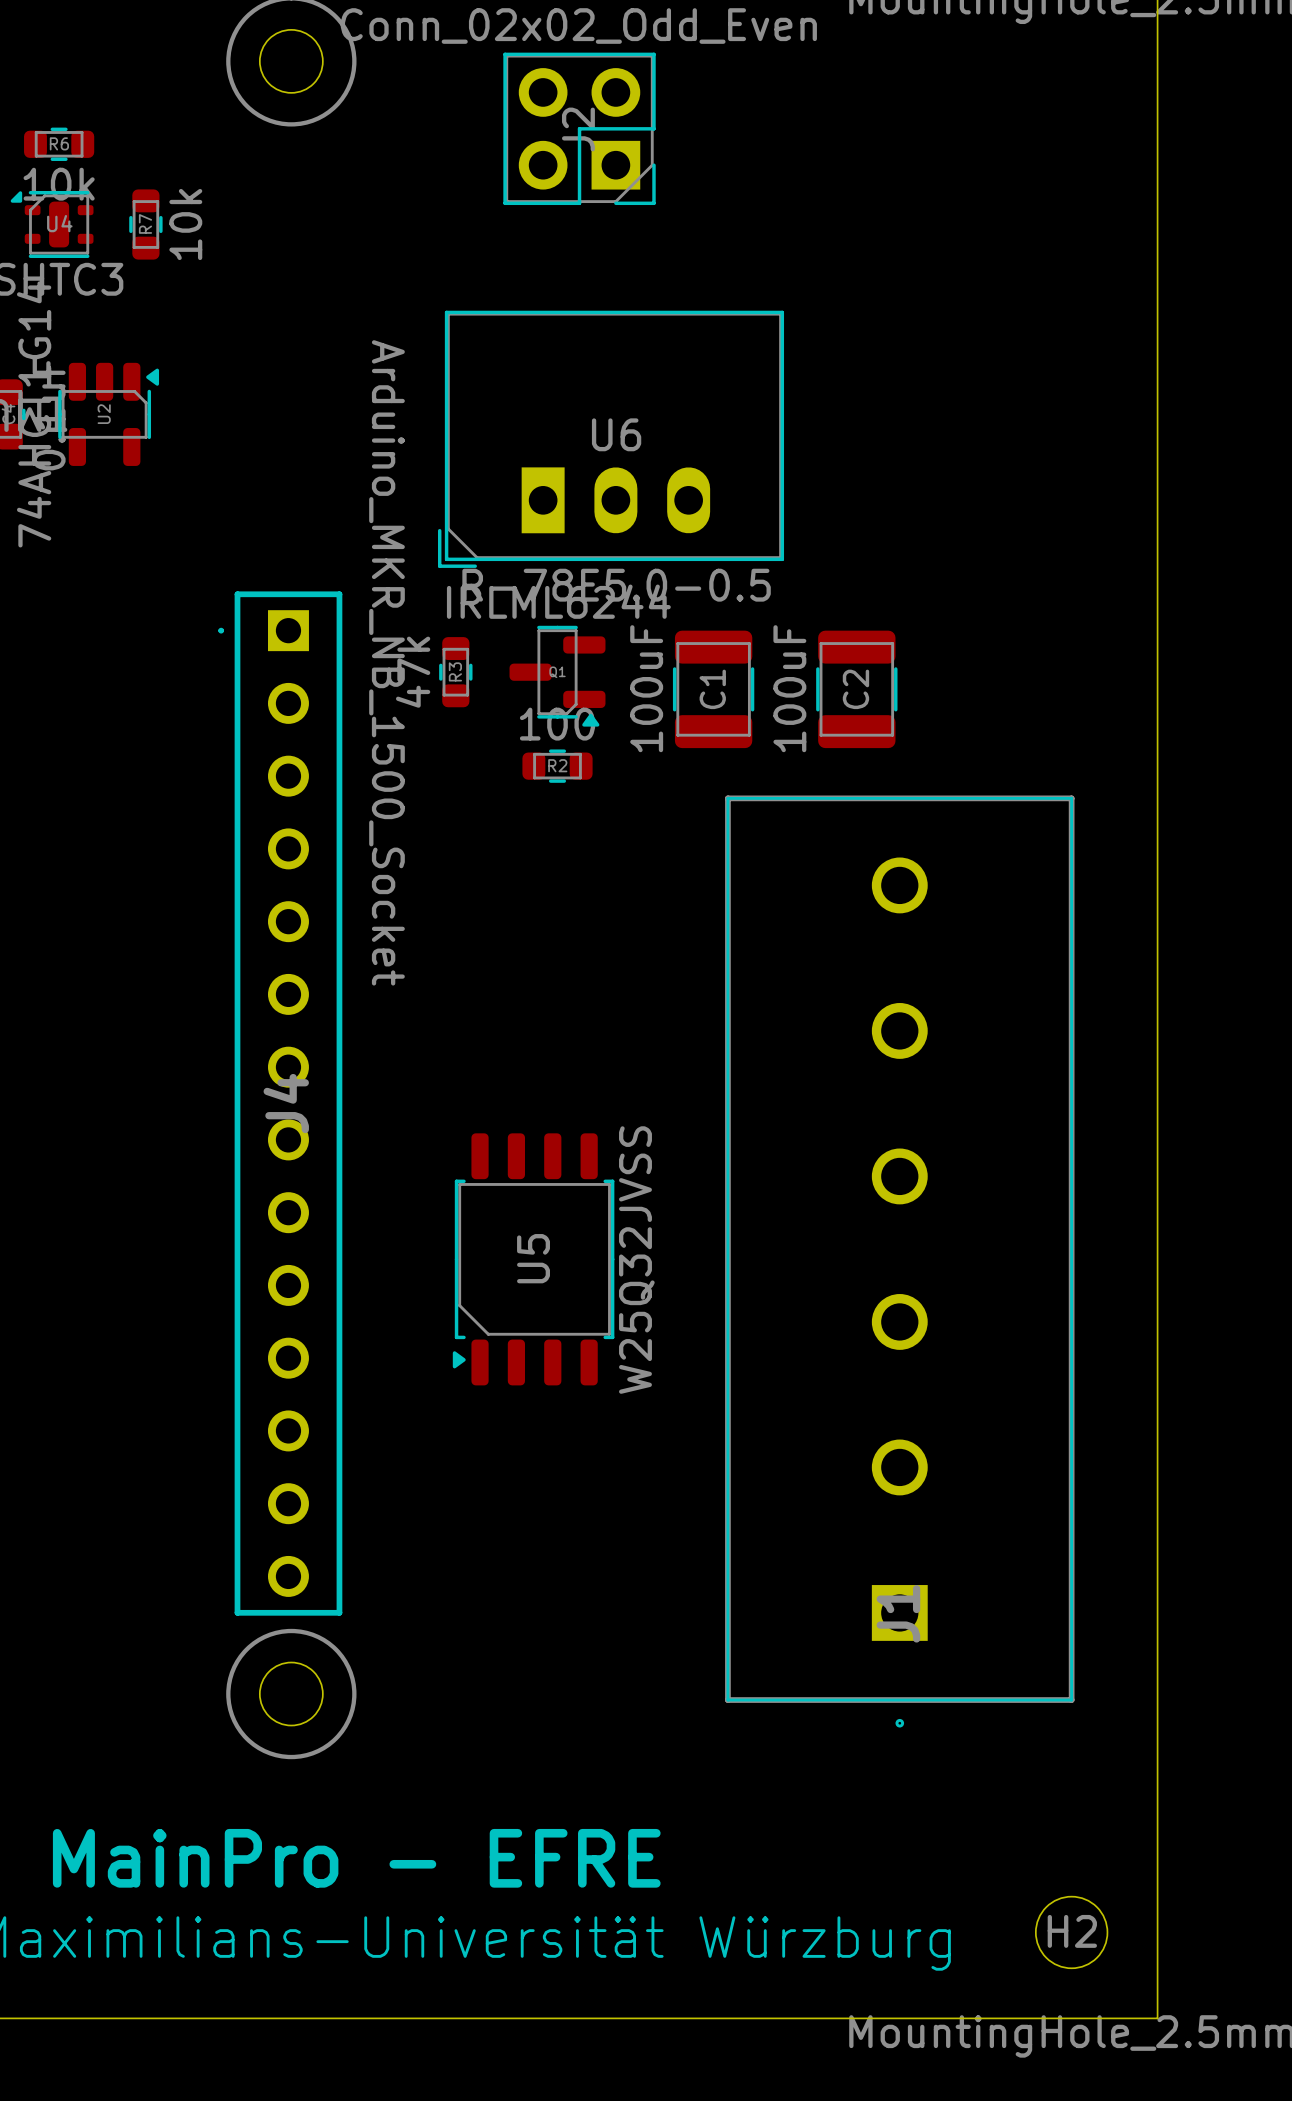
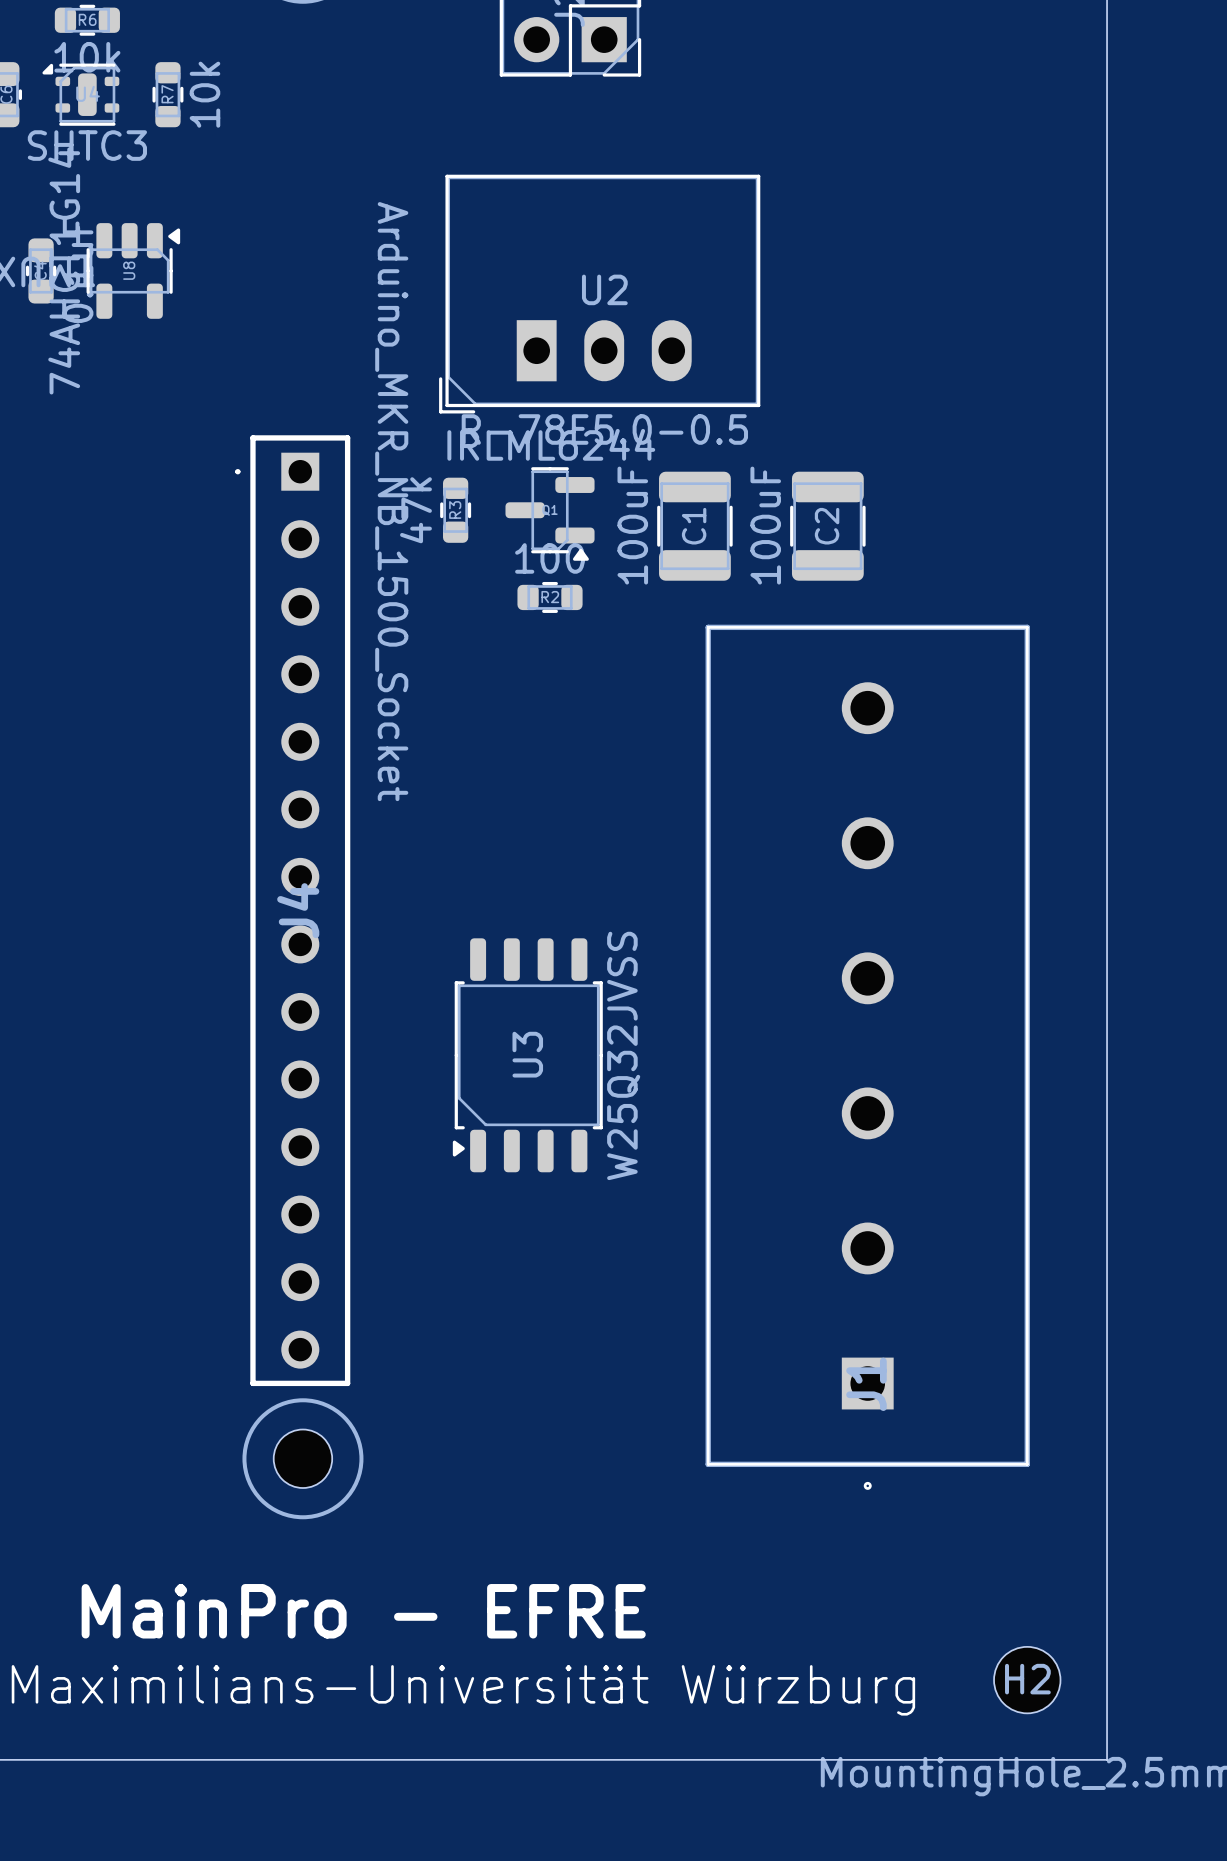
U2 name: U2 (104, 414) -> U8 (129, 270)
U6 name: U6 (616, 434) -> U2 (604, 289)
U5 name: U5 (533, 1258) -> U3 (527, 1054)

